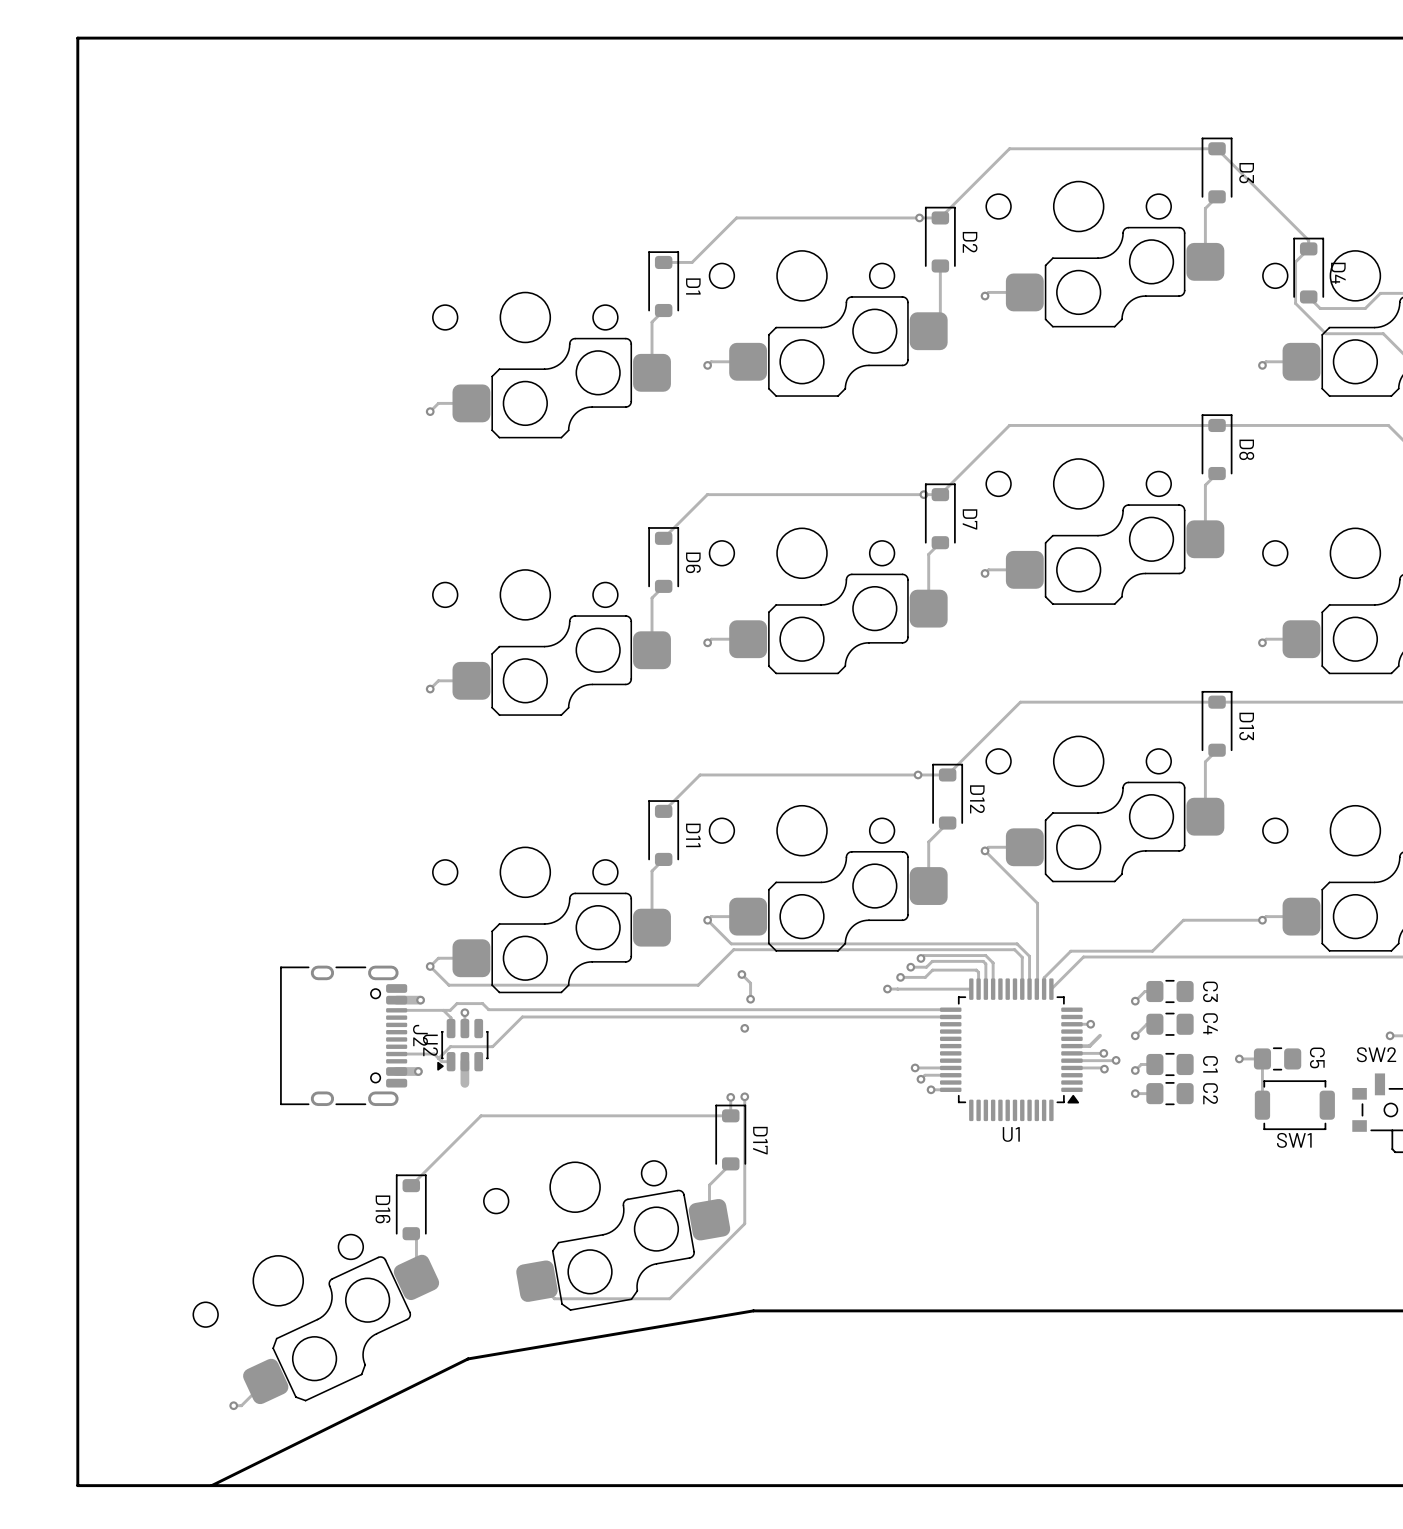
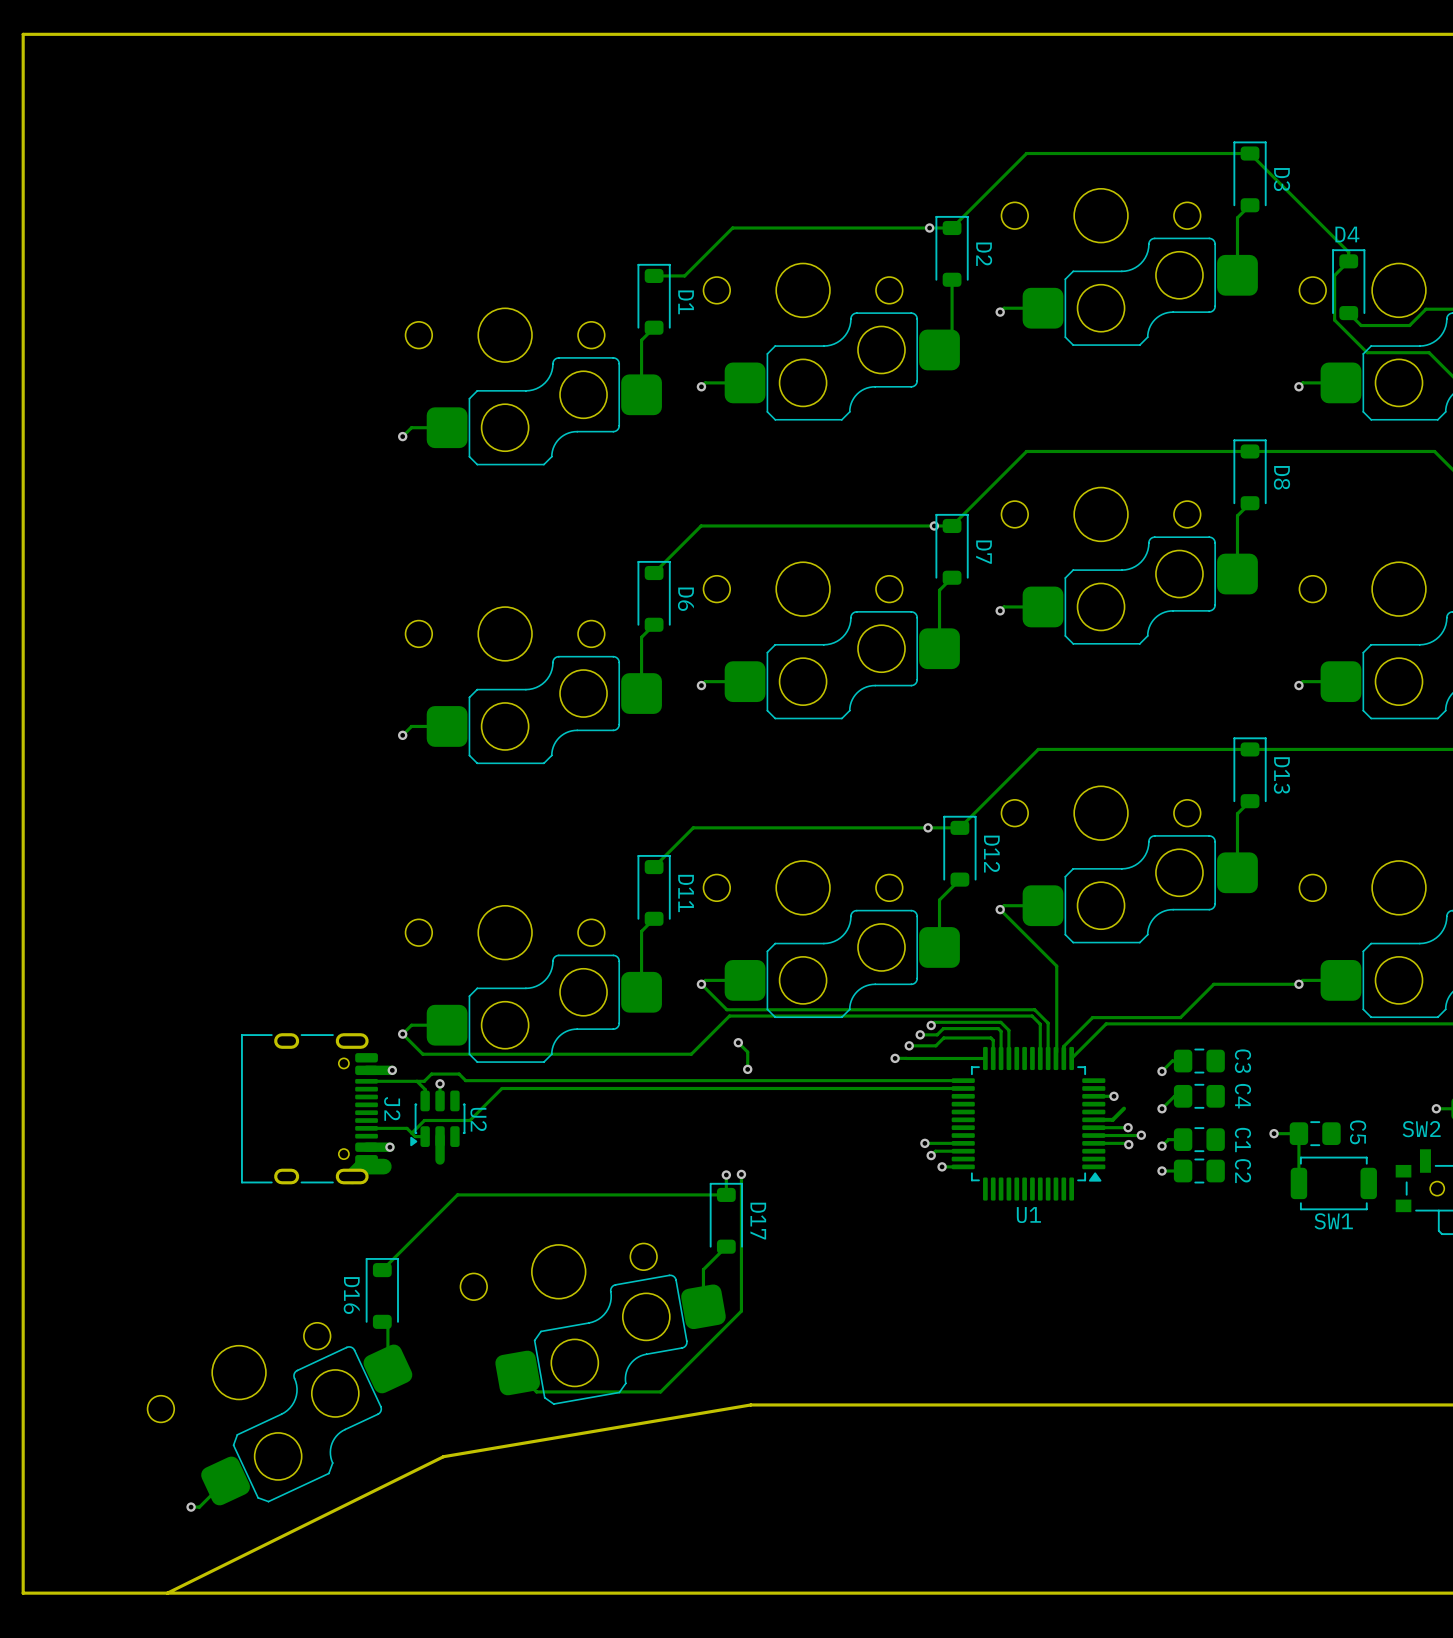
D4 name rotation: 0° (1338, 273) -> 90° counterclockwise (1347, 234)
D4 name position: D4 (1338, 273) -> D4 (1347, 234)
via: (744, 1028) -> none
U2 name position: U2 (430, 1045) -> U2 (478, 1119)
track: none -> (383, 1166) (362, 1166) (352, 1176)

